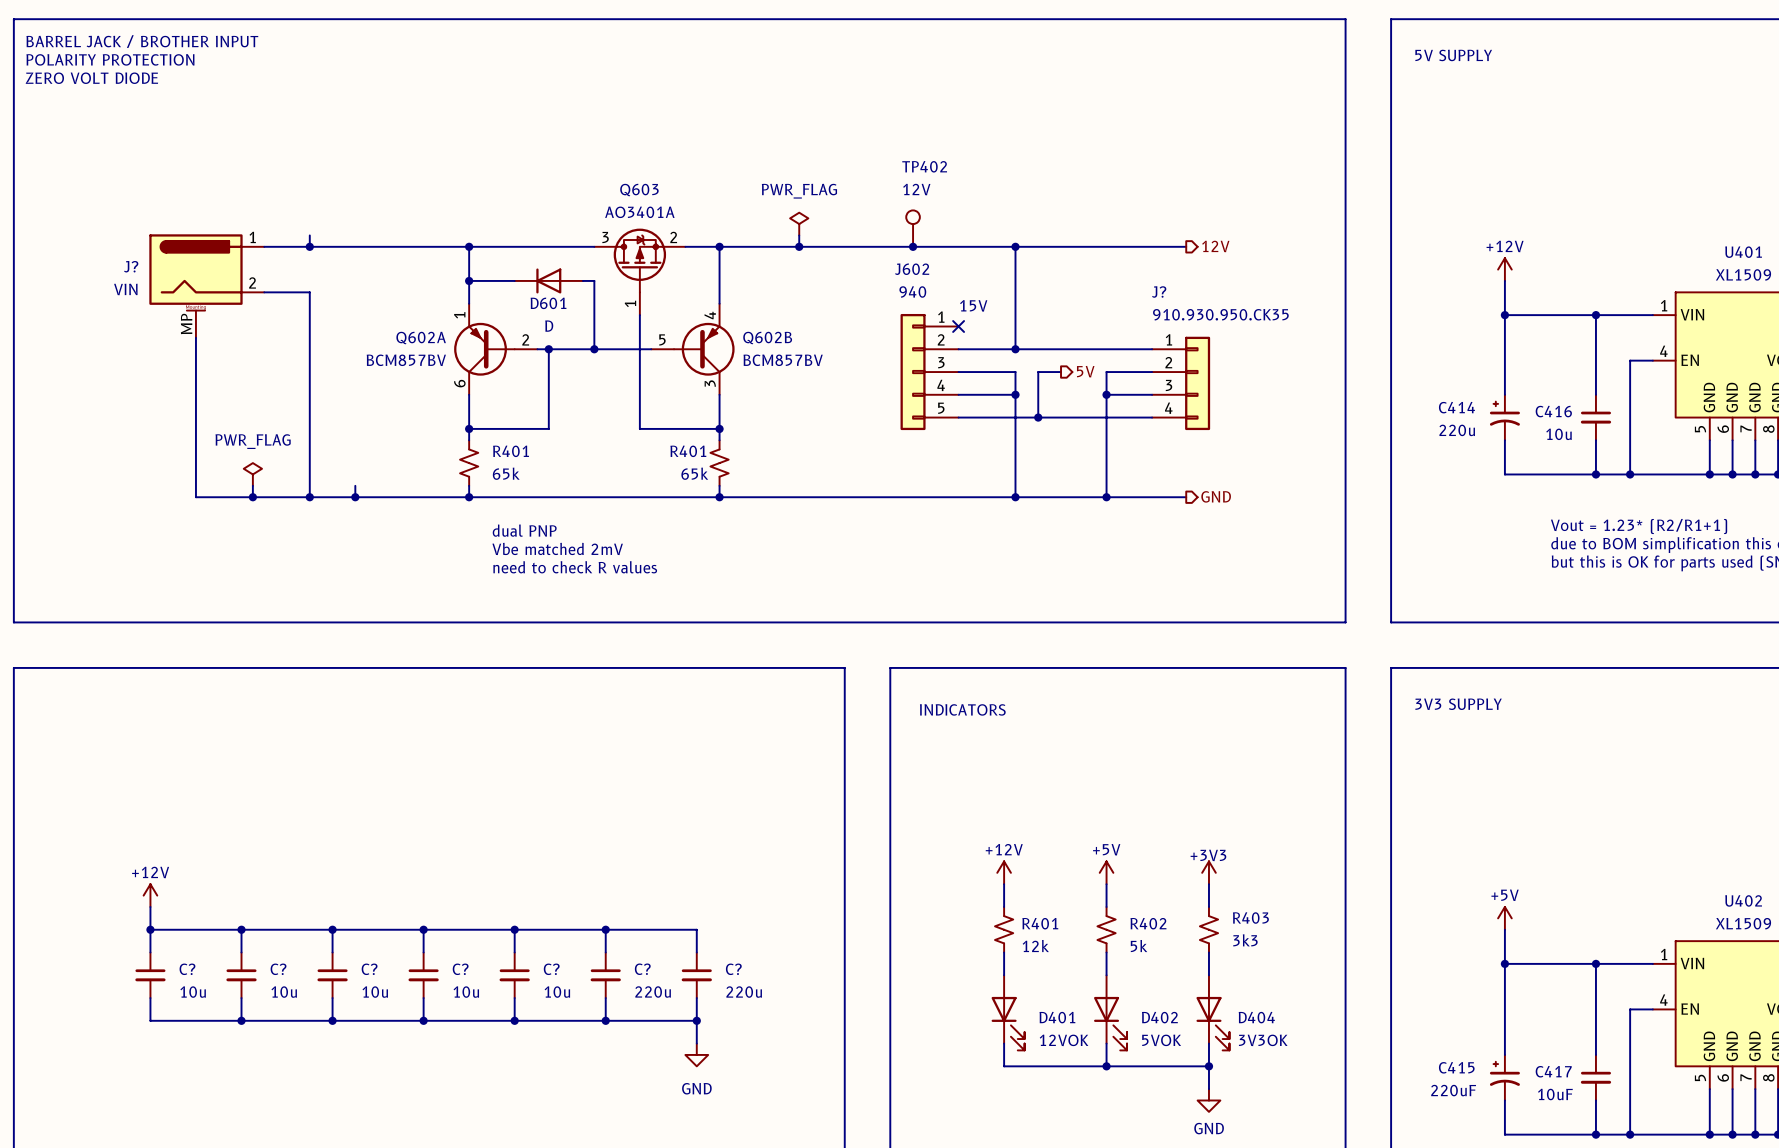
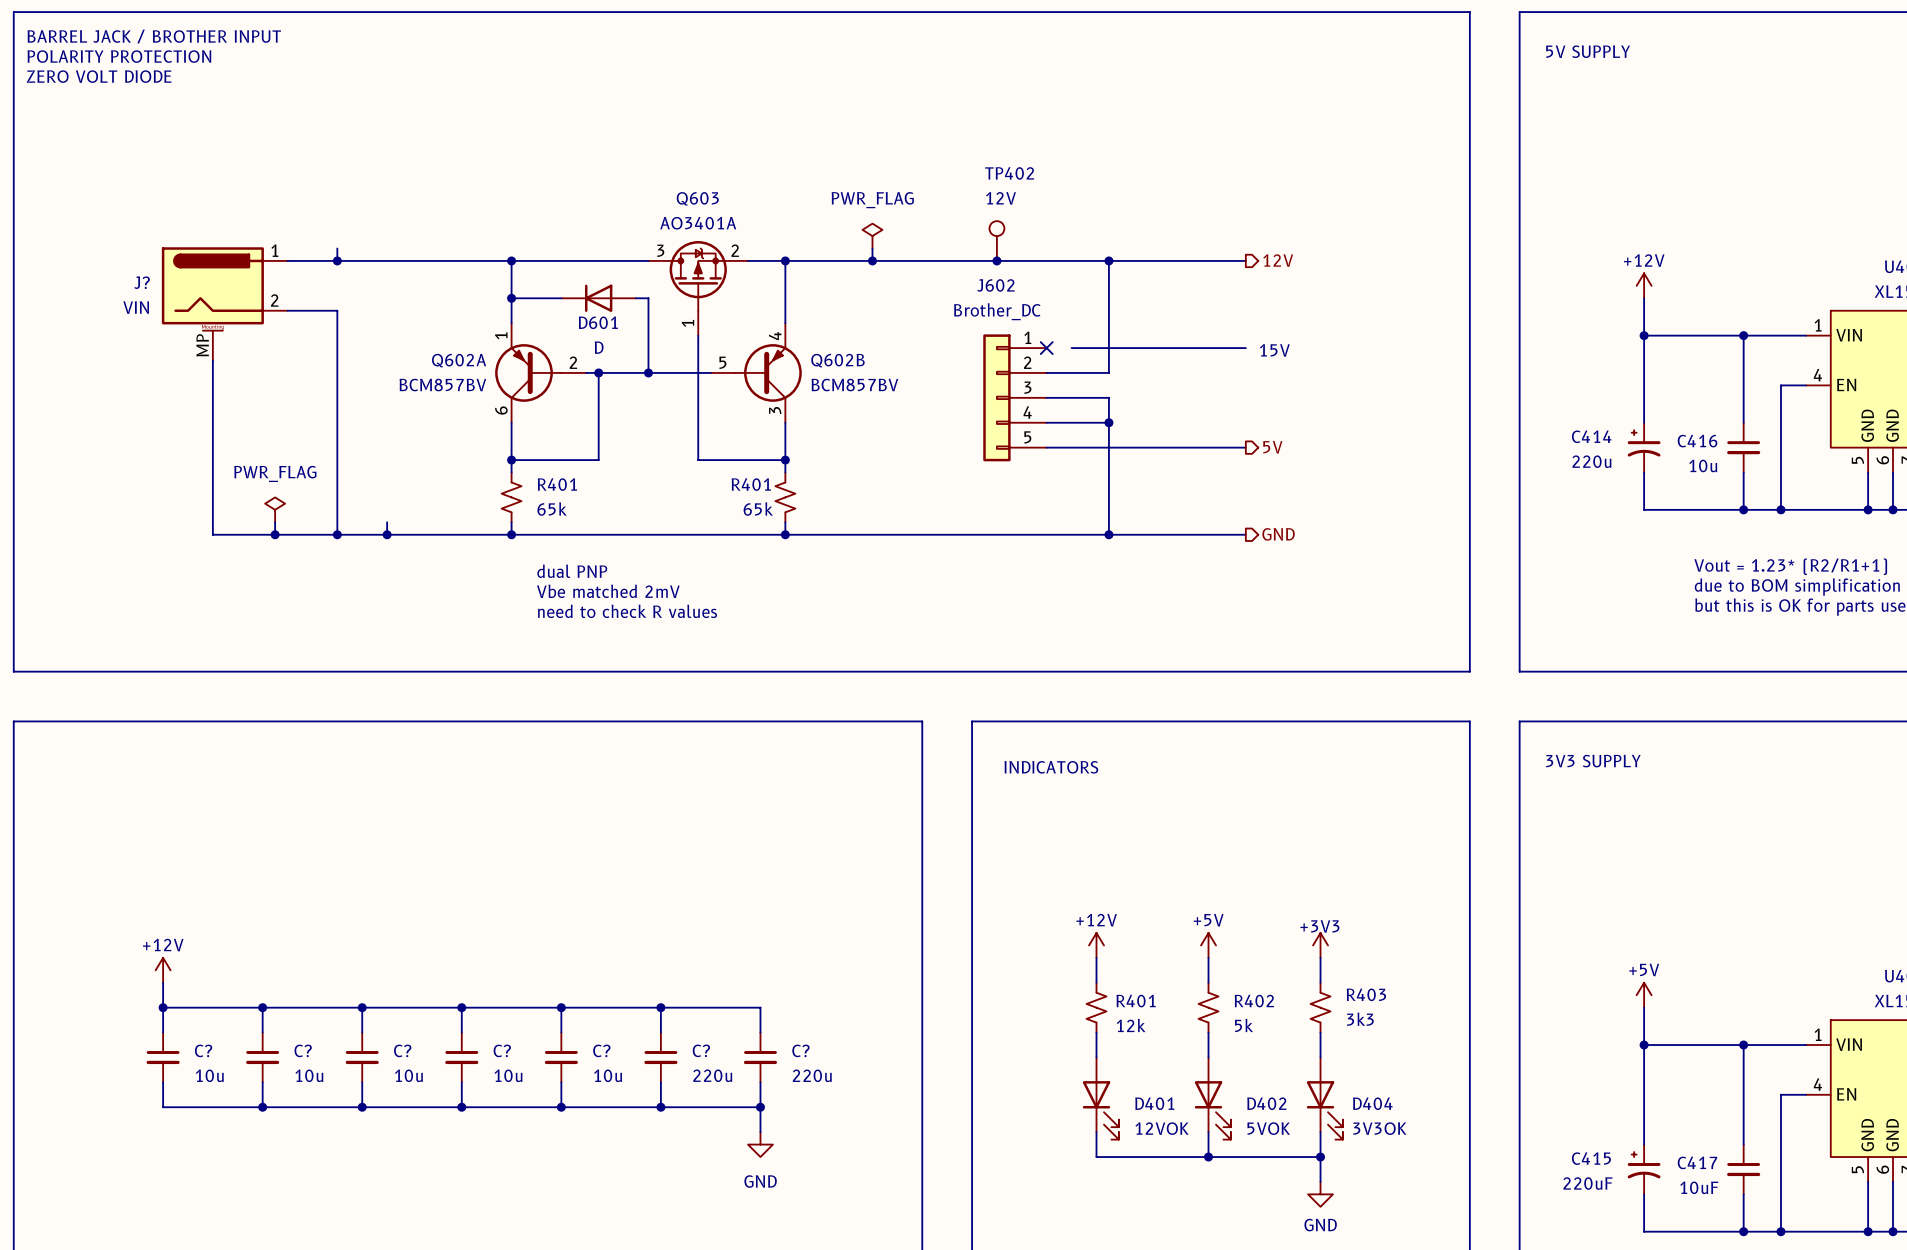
wire: (1140, 246) (1186, 246) -> none
hierarchical label position: 12V (1215, 246) -> 12V (1278, 260)
J602 value: 940 (912, 291) -> Brother_DC (997, 311)
text position: 15V (973, 305) -> 15V (1274, 350)
line: none -> (1071, 348) (1245, 348)
wire: (1015, 349) (1152, 349) -> none
junction: (1015, 349) -> none
hierarchical label position: 5V (1085, 371) -> 5V (1272, 447)
wire: (1061, 372) (1038, 372) (1038, 417) -> none
wire: (1152, 372) (1106, 372) (1106, 497) -> none
J?: 910.930.950.CK35 (1181, 383) -> none
wire: (1106, 394) (1152, 394) -> none
junction: (1106, 394) -> none
junction: (1038, 417) -> none
wire: (1140, 417) (1152, 417) -> none
hierarchical label position: GND (1216, 496) -> GND (1278, 534)
junction: (1106, 497) -> none
wire: (1140, 497) (1186, 497) -> none

